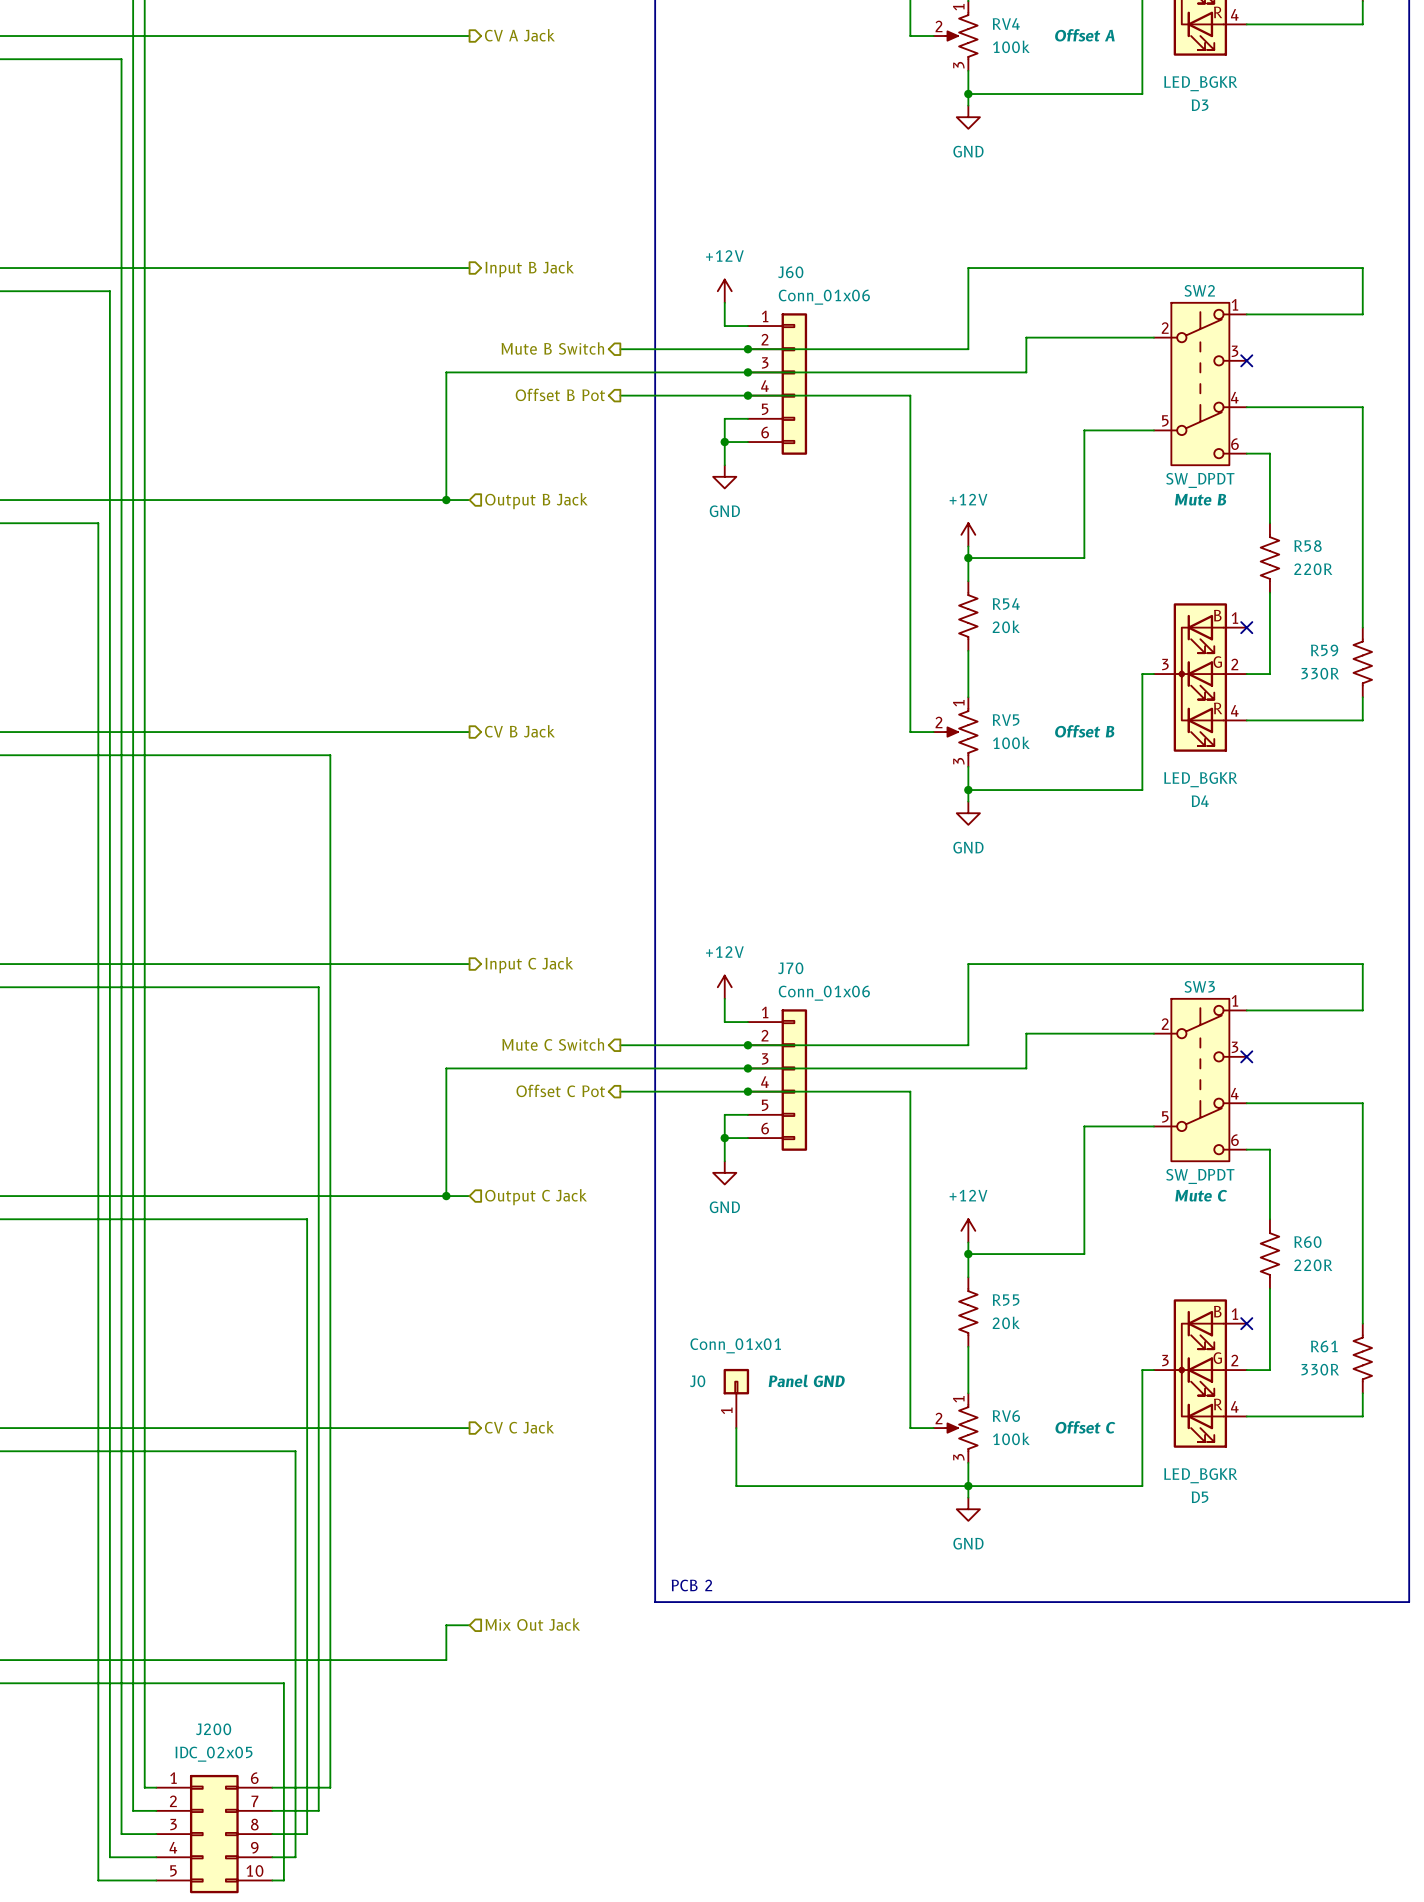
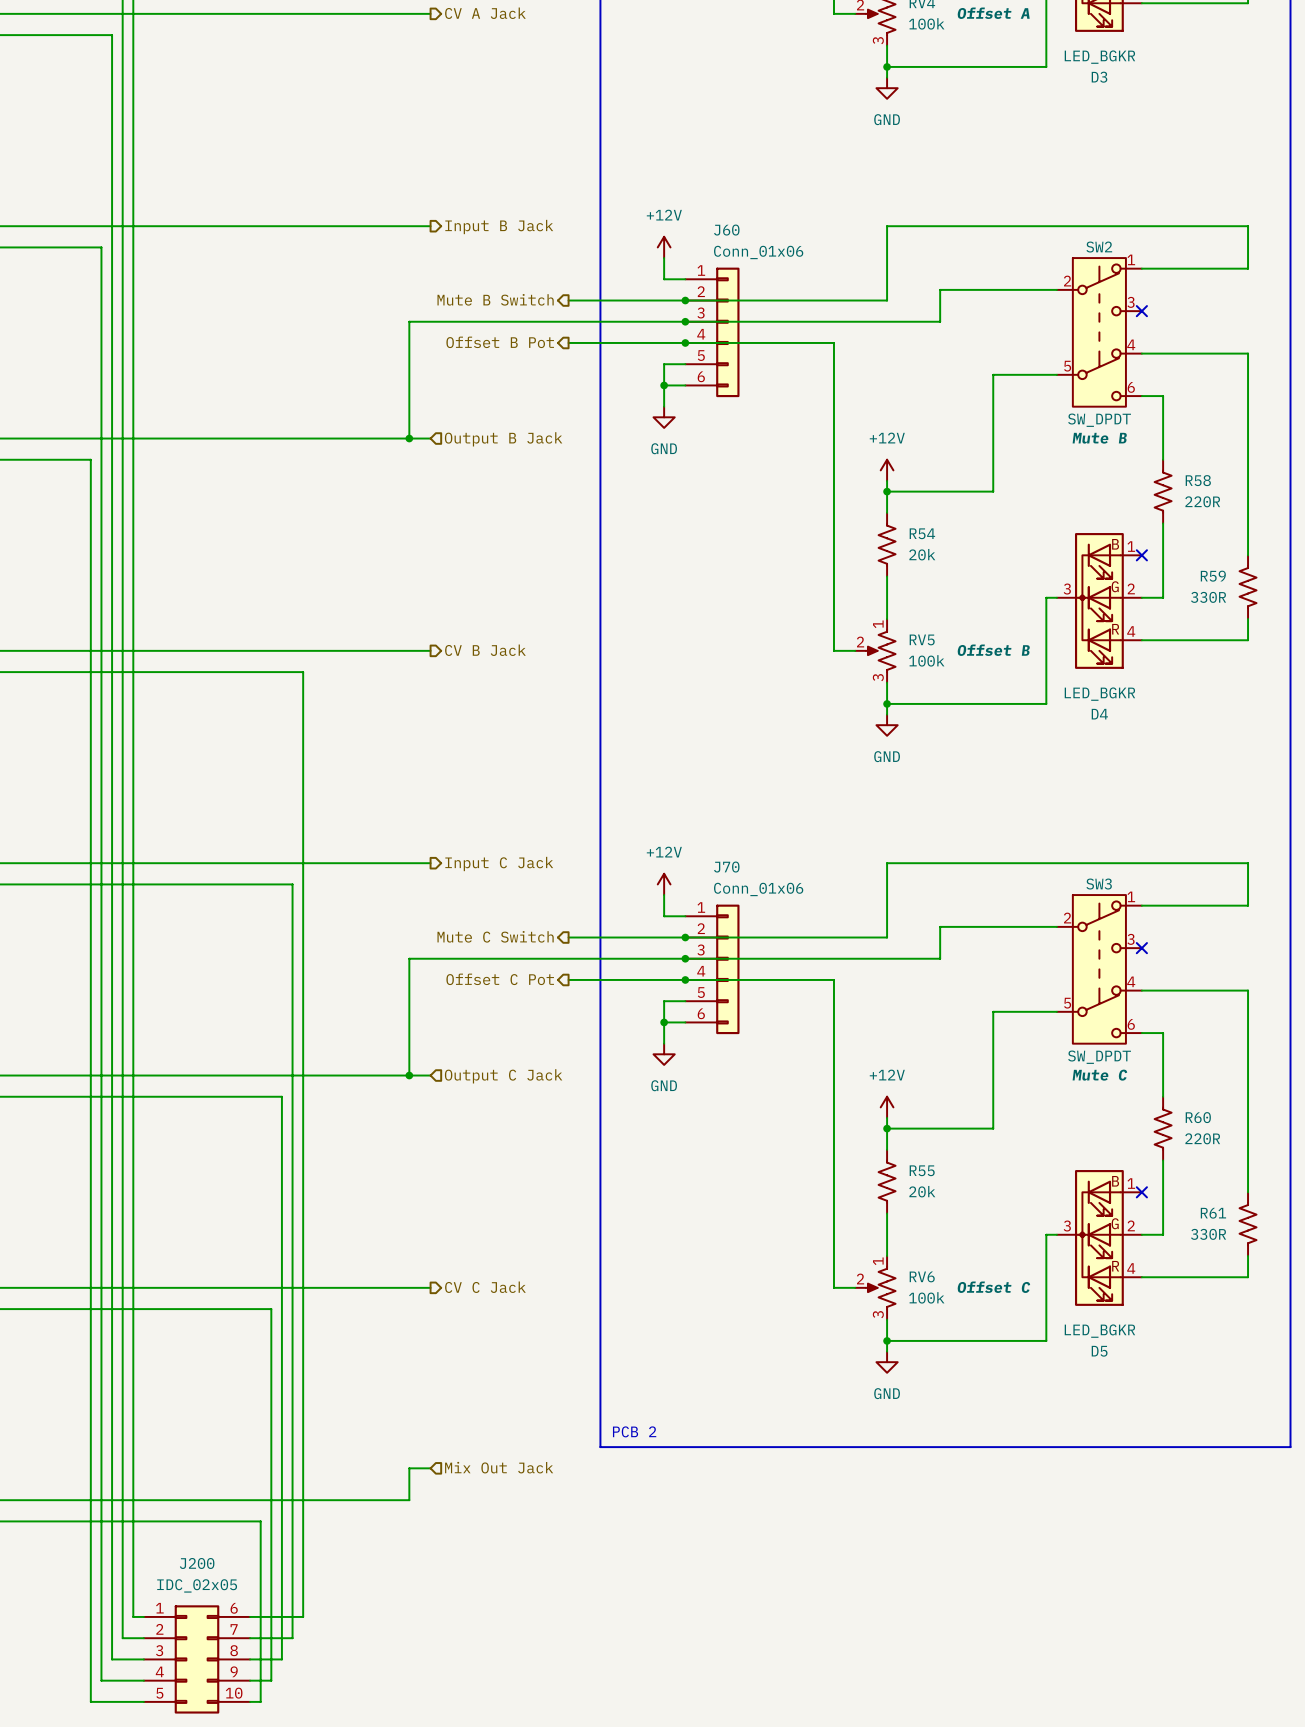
J0: Conn_01x01 (736, 1398) -> none
wire: (736, 1428) (736, 1486) (968, 1486) -> none

